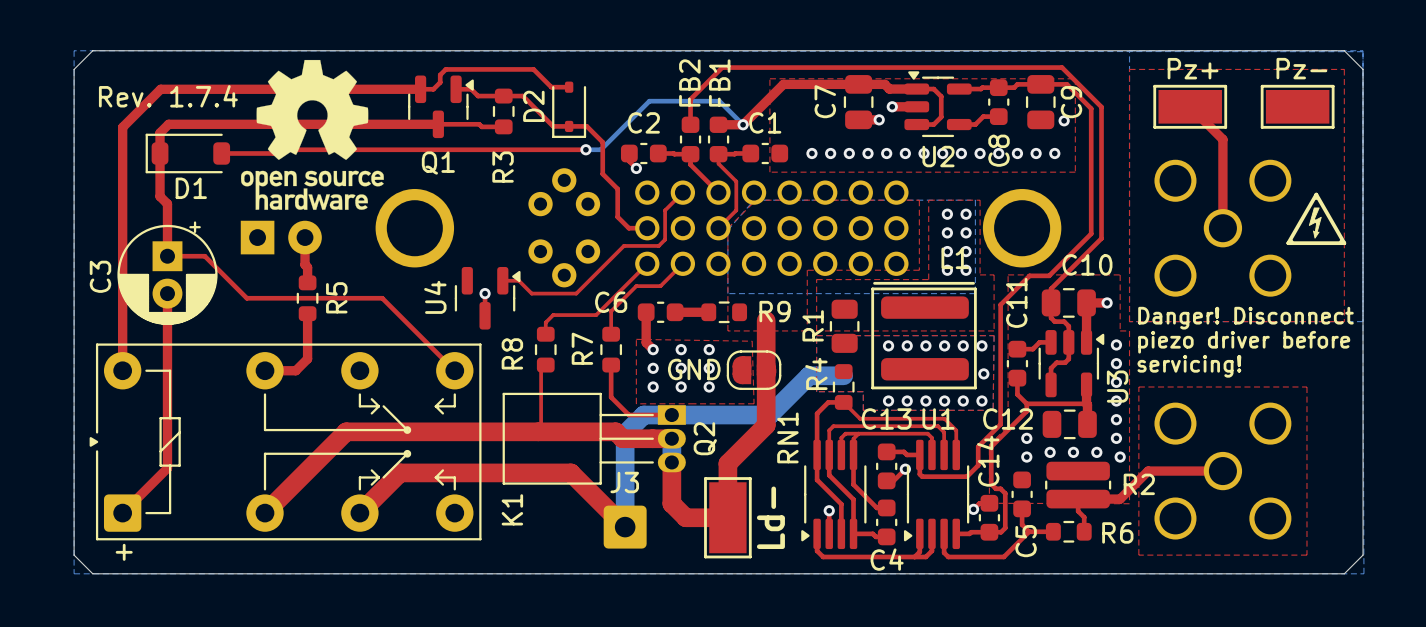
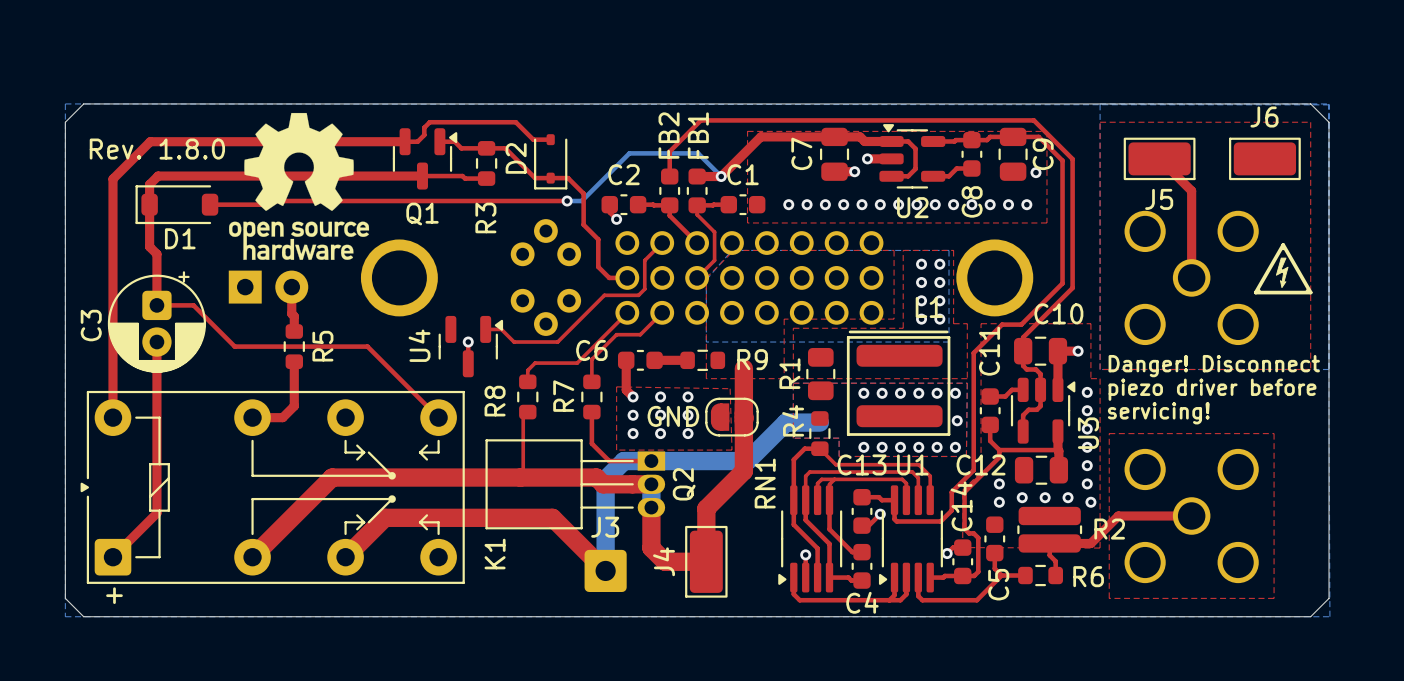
text: Rev. 1.7.4 (168, 96) -> Rev. 1.8.0 (157, 149)
part: Pz+ (1190, 106) -> none
J5: none -> (1159, 158)
part: Pz- (1297, 106) -> none
J6: none -> (1264, 158)
C3 footprint: [117, 221, 218, 325] -> [107, 271, 207, 373]
part: Ld- (727, 517) -> none
J4: none -> (706, 561)

